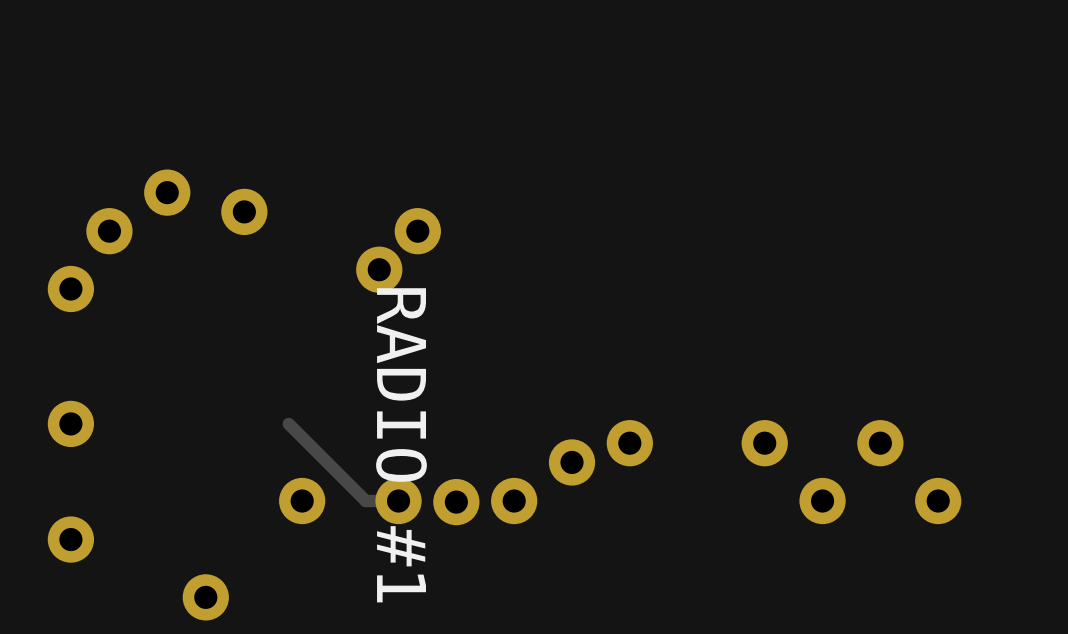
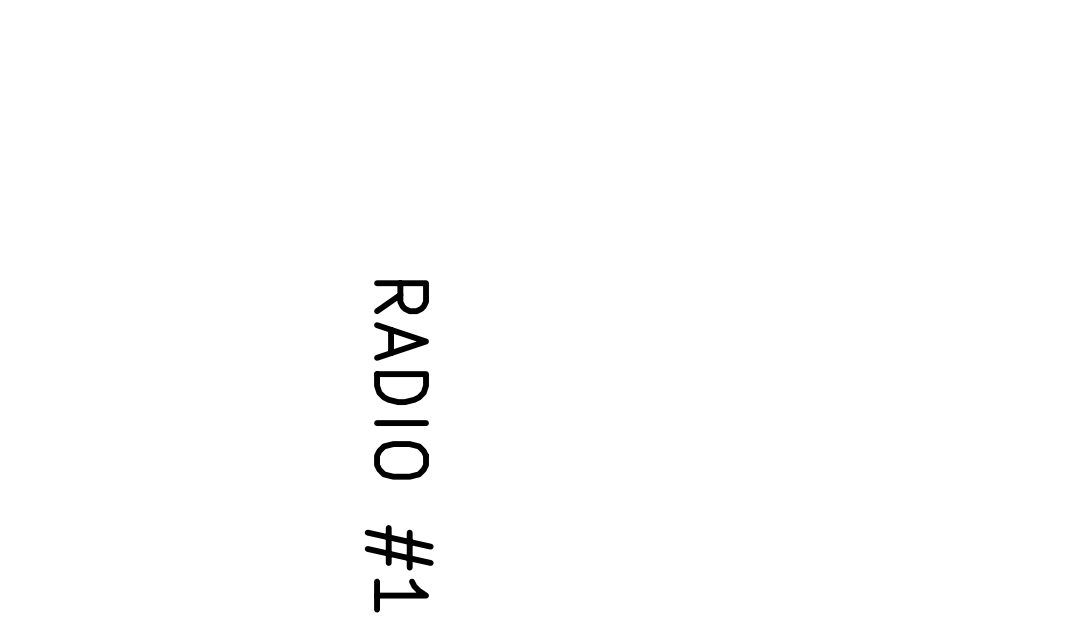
via: (167, 192) -> none
via: (244, 211) -> none
via: (109, 231) -> none
via: (417, 231) -> none
via: (379, 269) -> none
via: (70, 289) -> none
via: (70, 423) -> none
track: (288, 423) (365, 501) (398, 501) -> none
via: (629, 443) -> none
via: (764, 443) -> none
via: (880, 443) -> none
via: (572, 462) -> none
via: (302, 501) -> none
via: (398, 501) -> none
via: (514, 501) -> none
via: (822, 501) -> none
via: (938, 501) -> none
via: (456, 502) -> none
via: (70, 539) -> none
via: (205, 597) -> none

